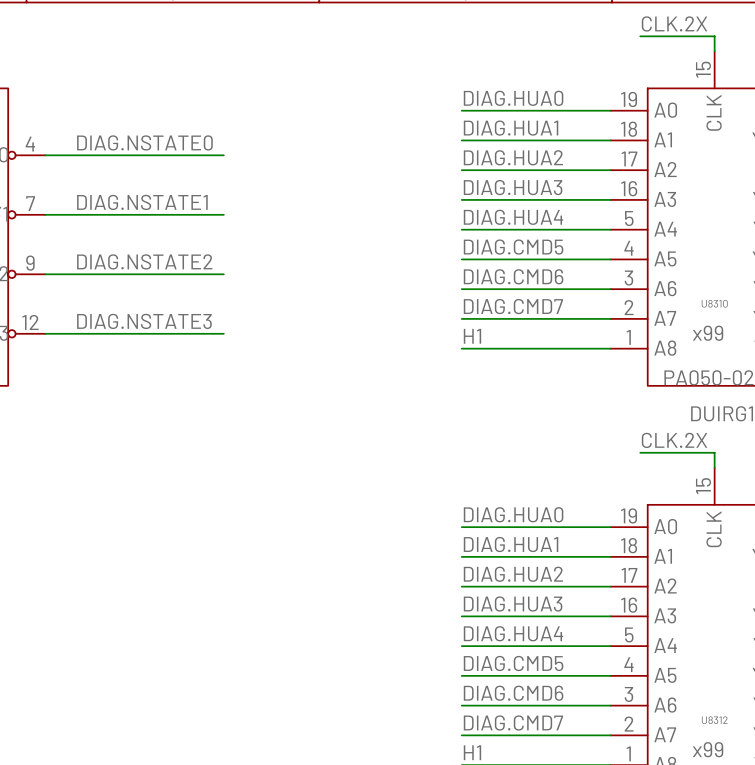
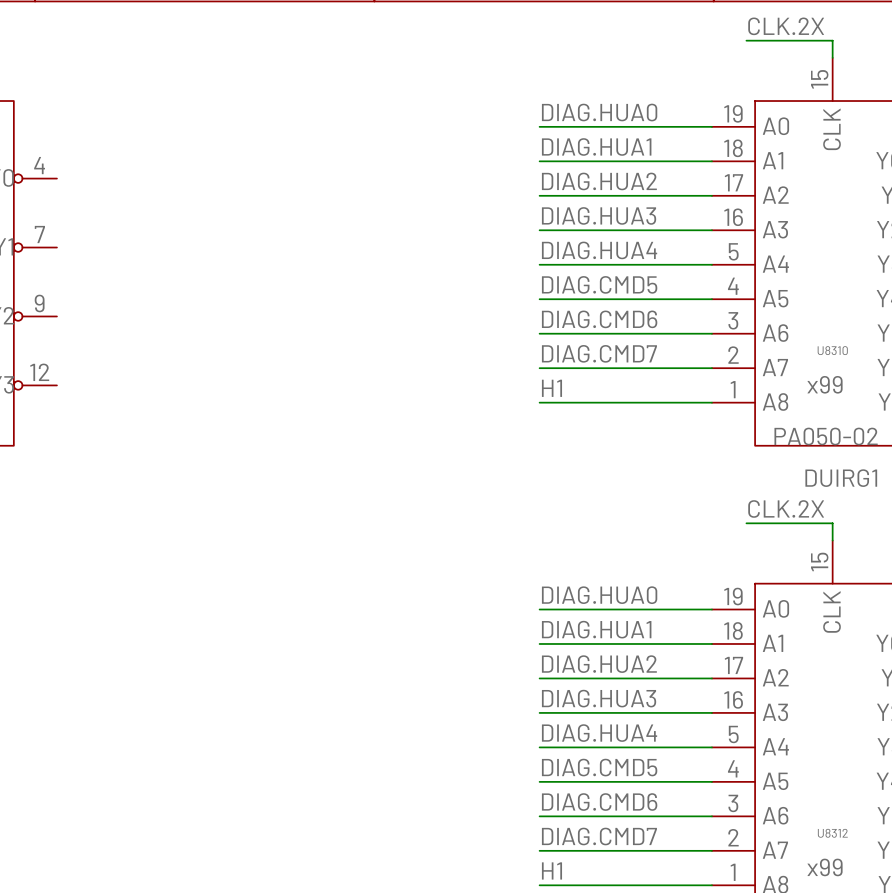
label: DIAG.NSTATE0 (144, 142) -> none
wire: (45, 155) (223, 155) -> none
label: DIAG.NSTATE1 (142, 202) -> none
wire: (45, 214) (223, 214) -> none
label: DIAG.NSTATE2 (144, 261) -> none
wire: (45, 274) (223, 274) -> none
label: DIAG.NSTATE3 (144, 321) -> none
wire: (45, 333) (223, 333) -> none

